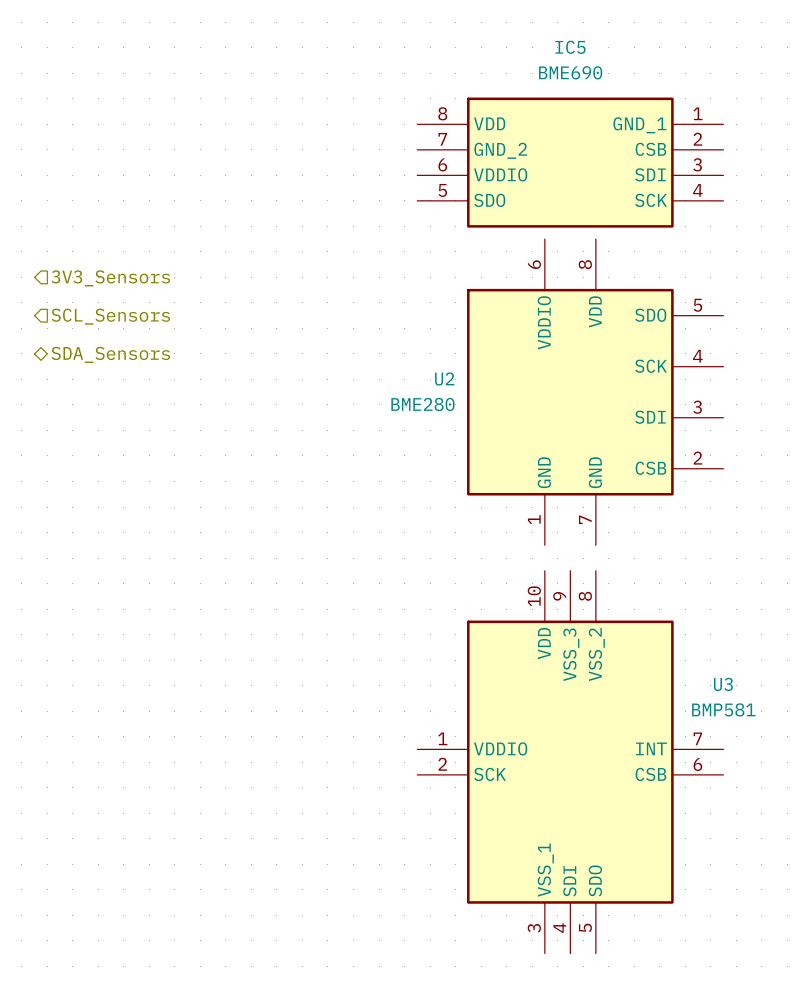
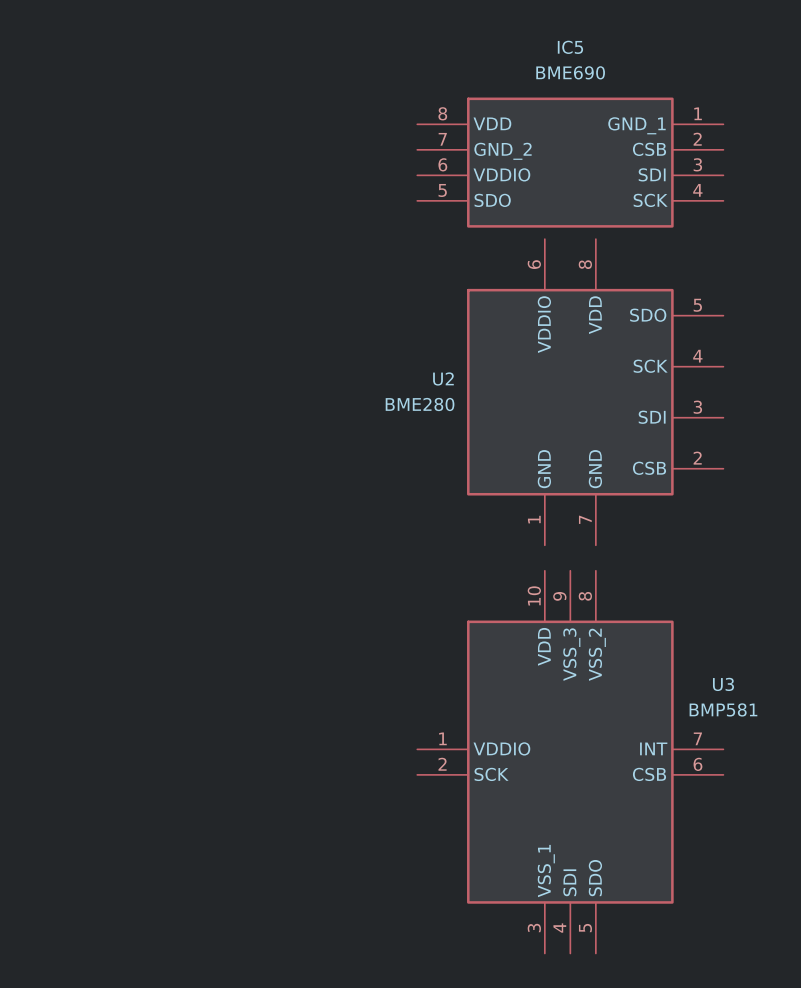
hierarchical label: 3V3_Sensors (110, 278) -> none
hierarchical label: SCL_Sensors (110, 316) -> none
hierarchical label: SDA_Sensors (110, 354) -> none

